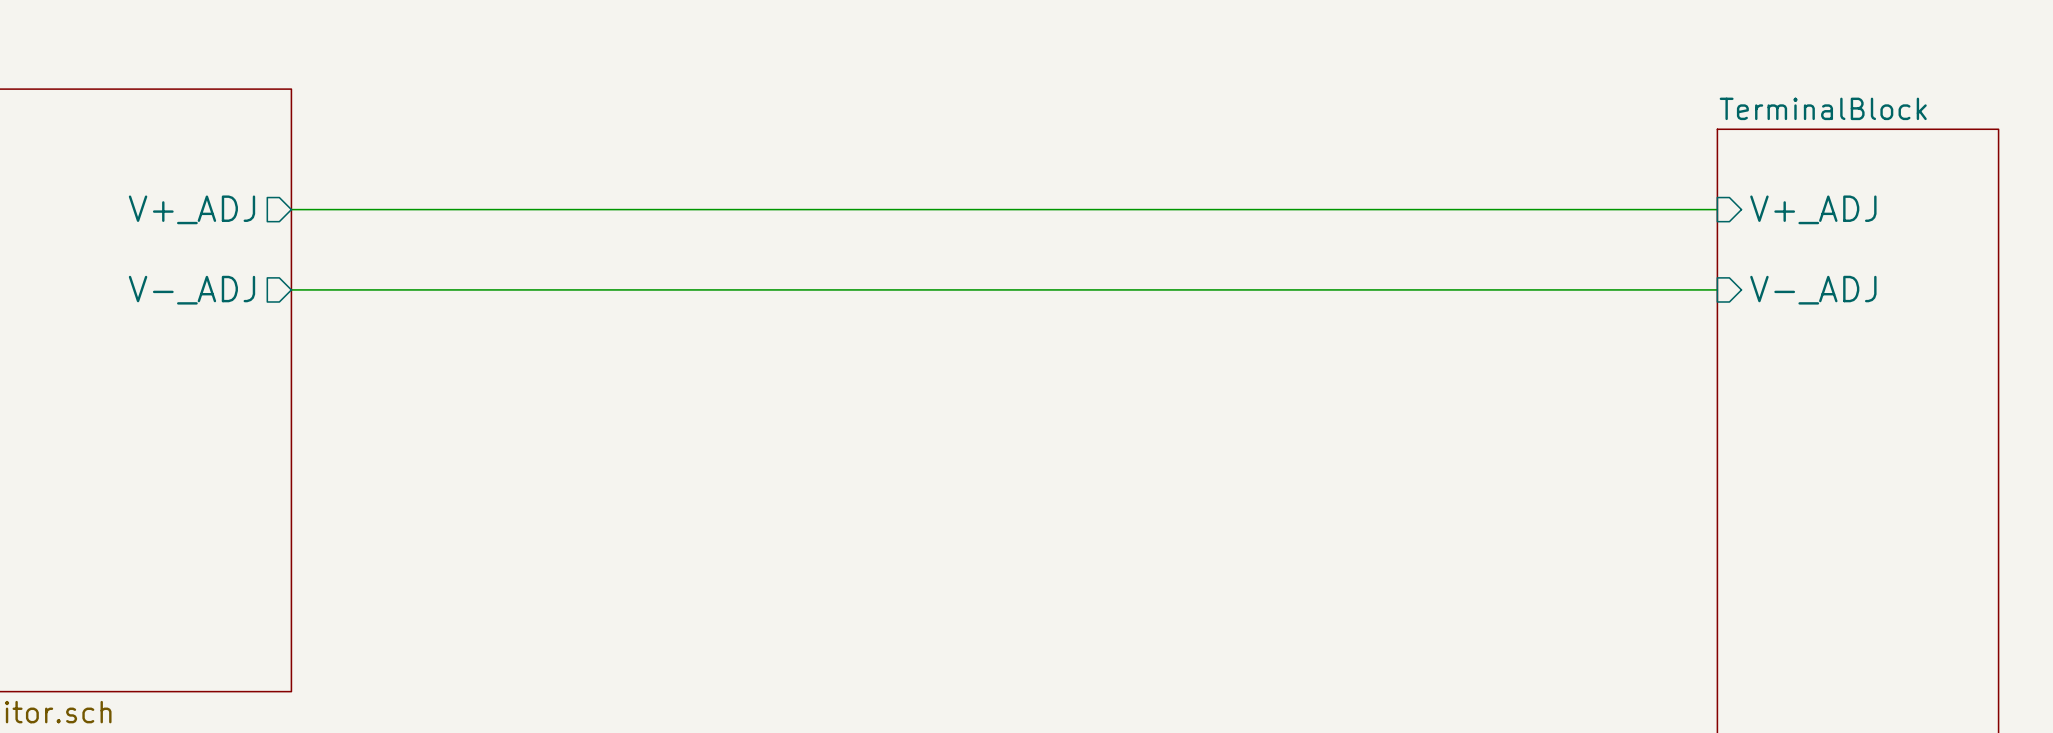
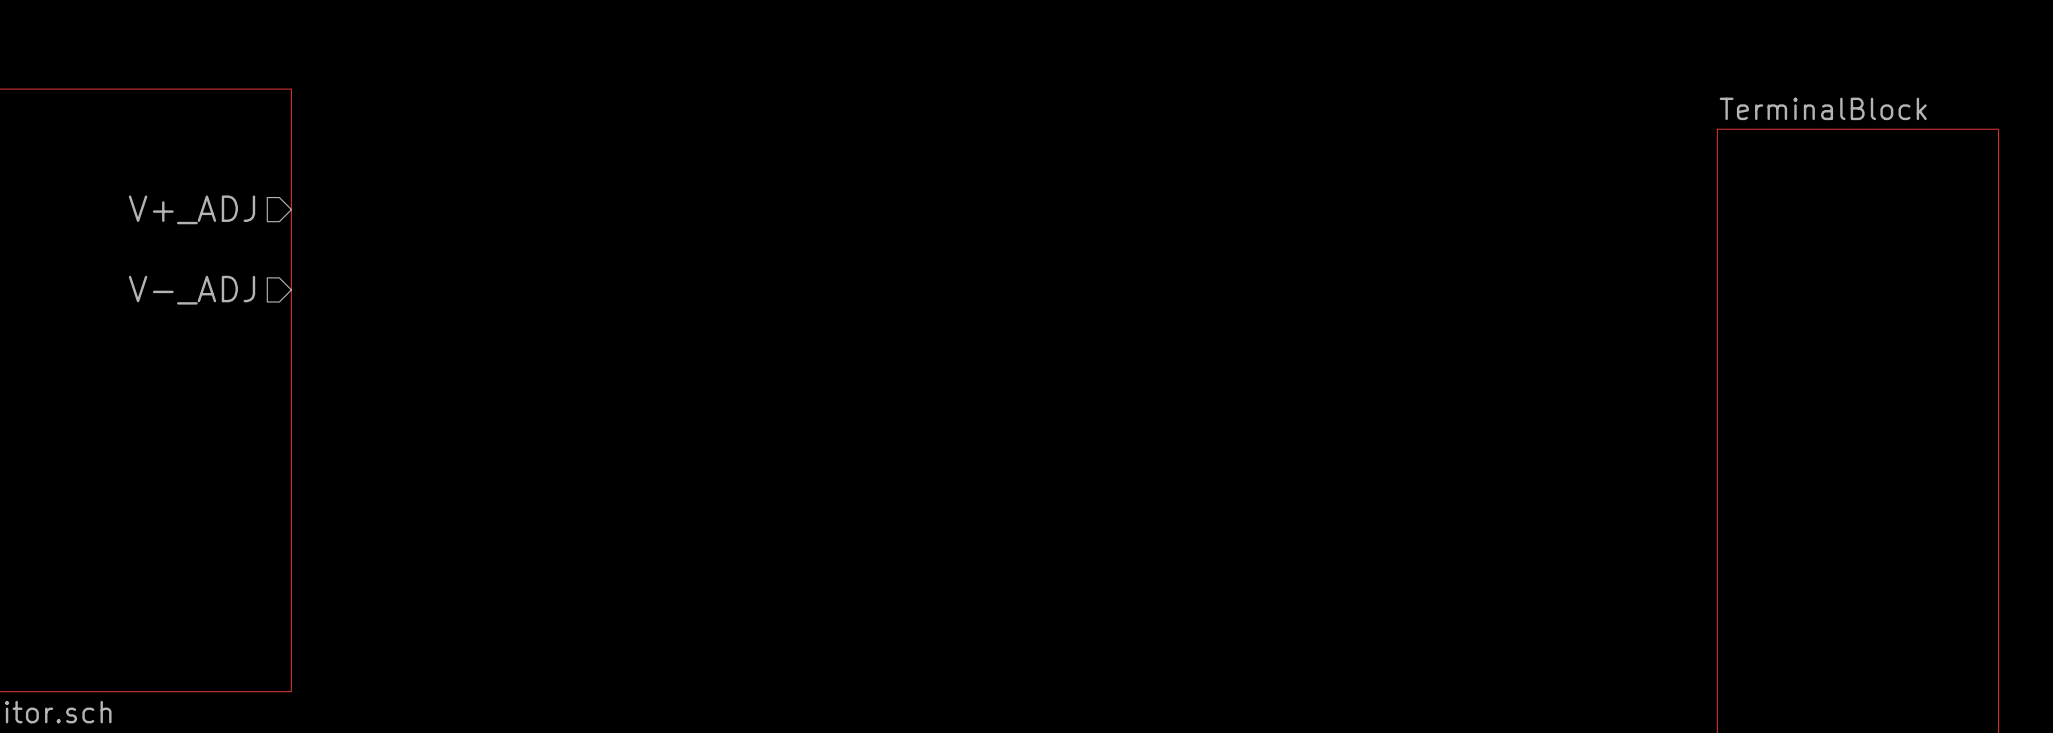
wire: (291, 209) (1717, 209) -> none
sheet pin: V+_ADJ (1813, 209) -> none
wire: (291, 289) (1717, 289) -> none
sheet pin: V-_ADJ (1813, 290) -> none

